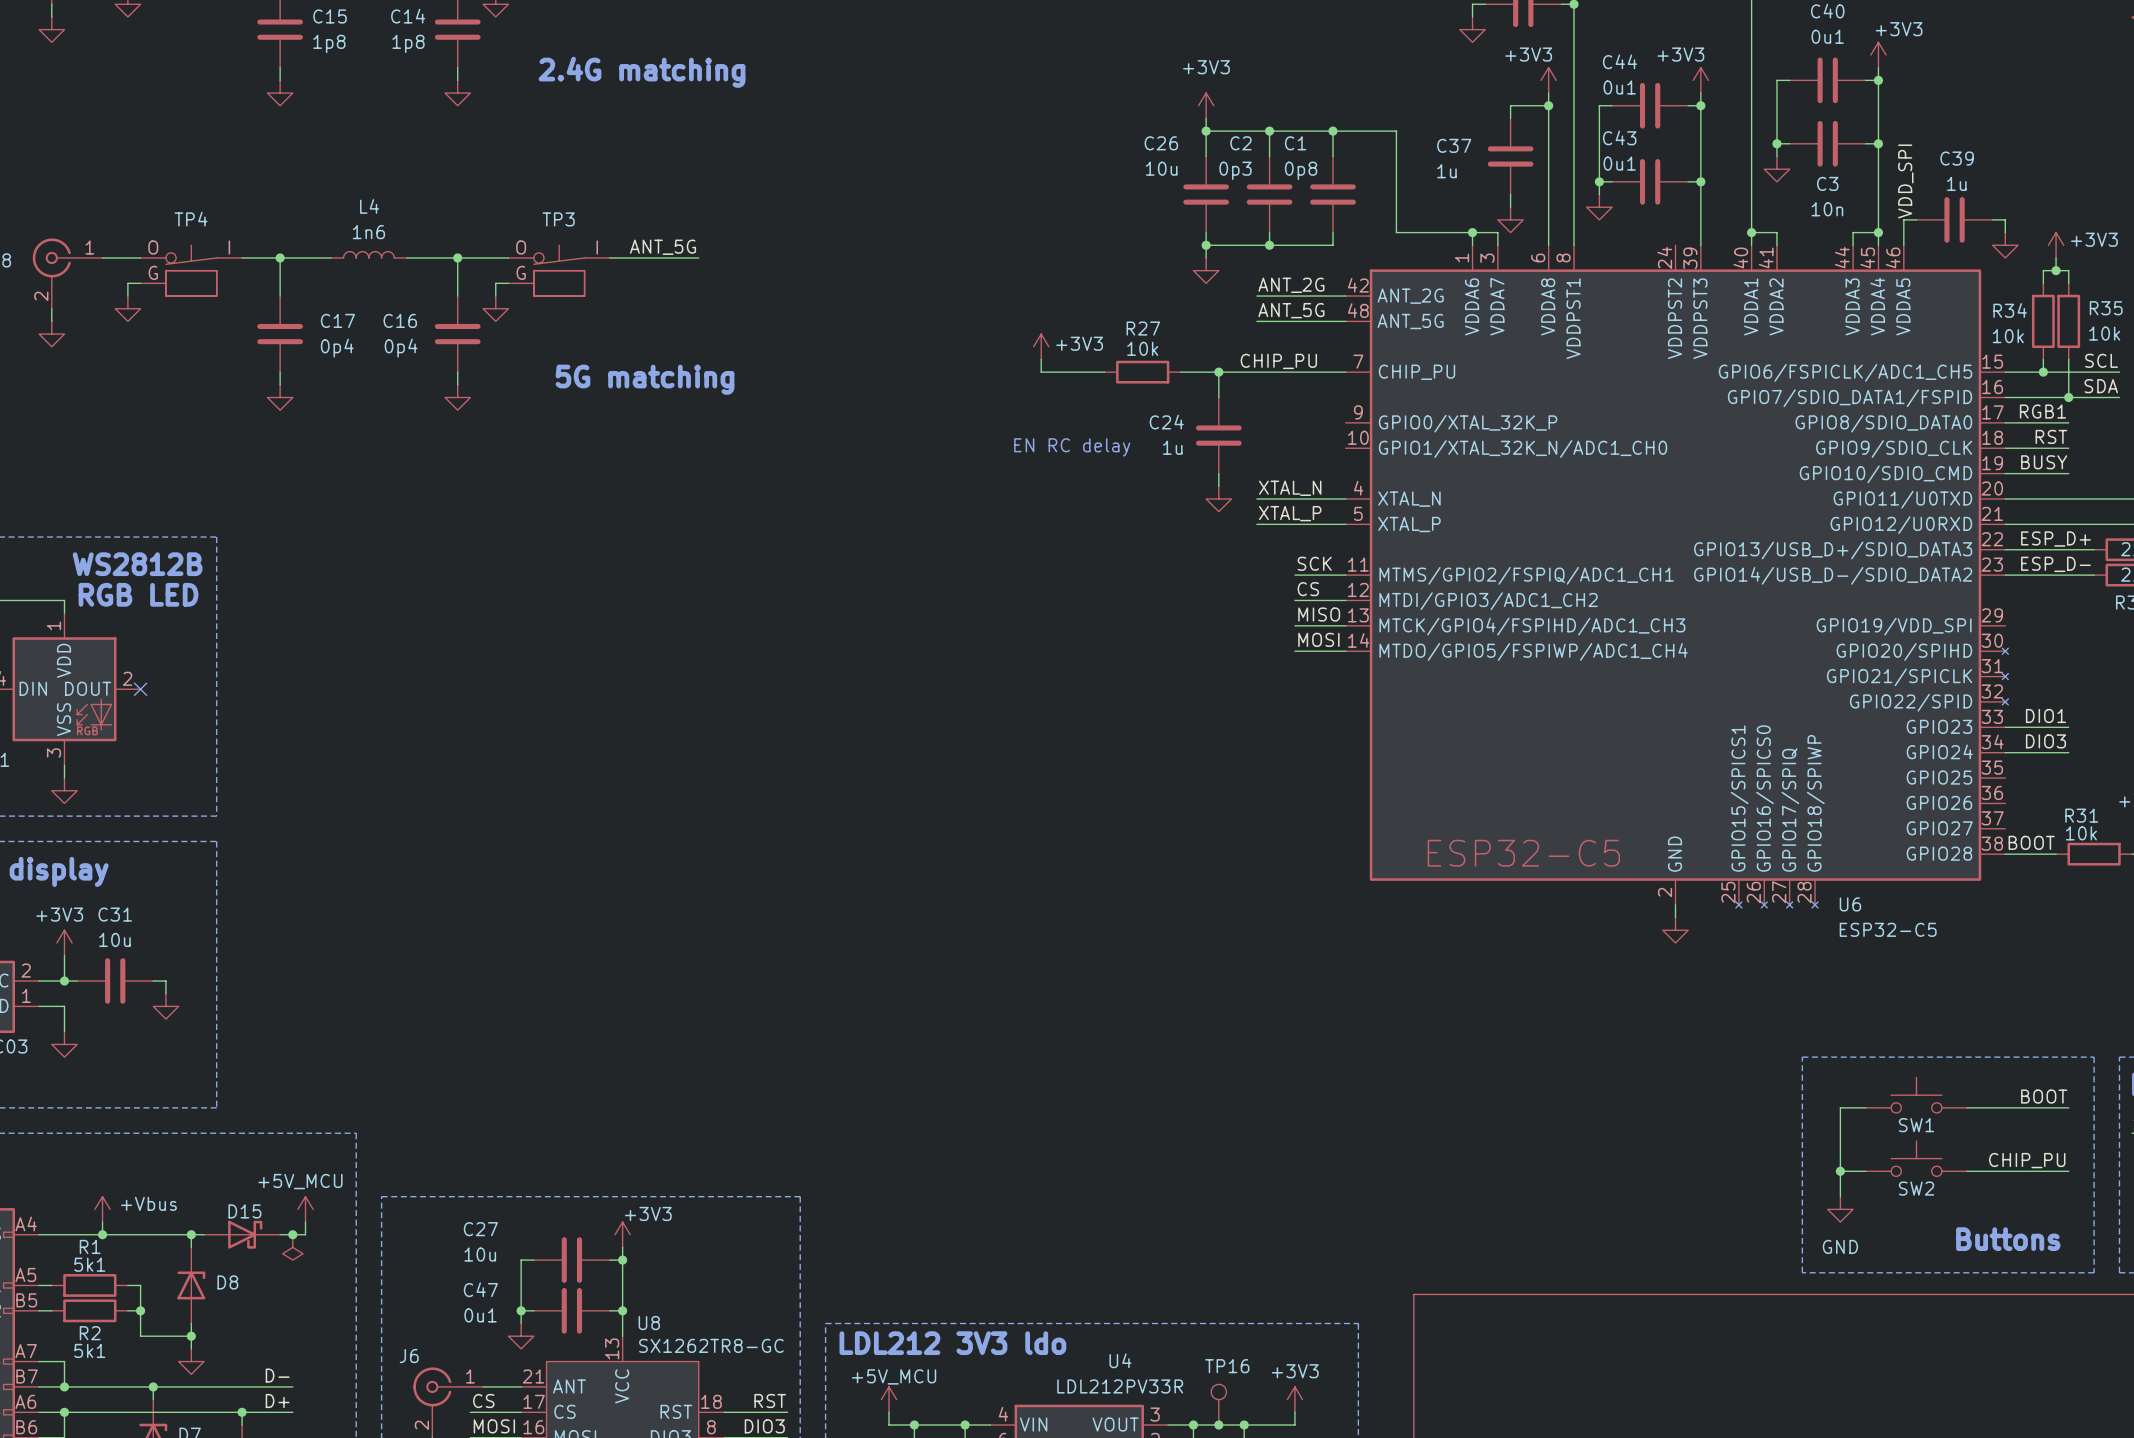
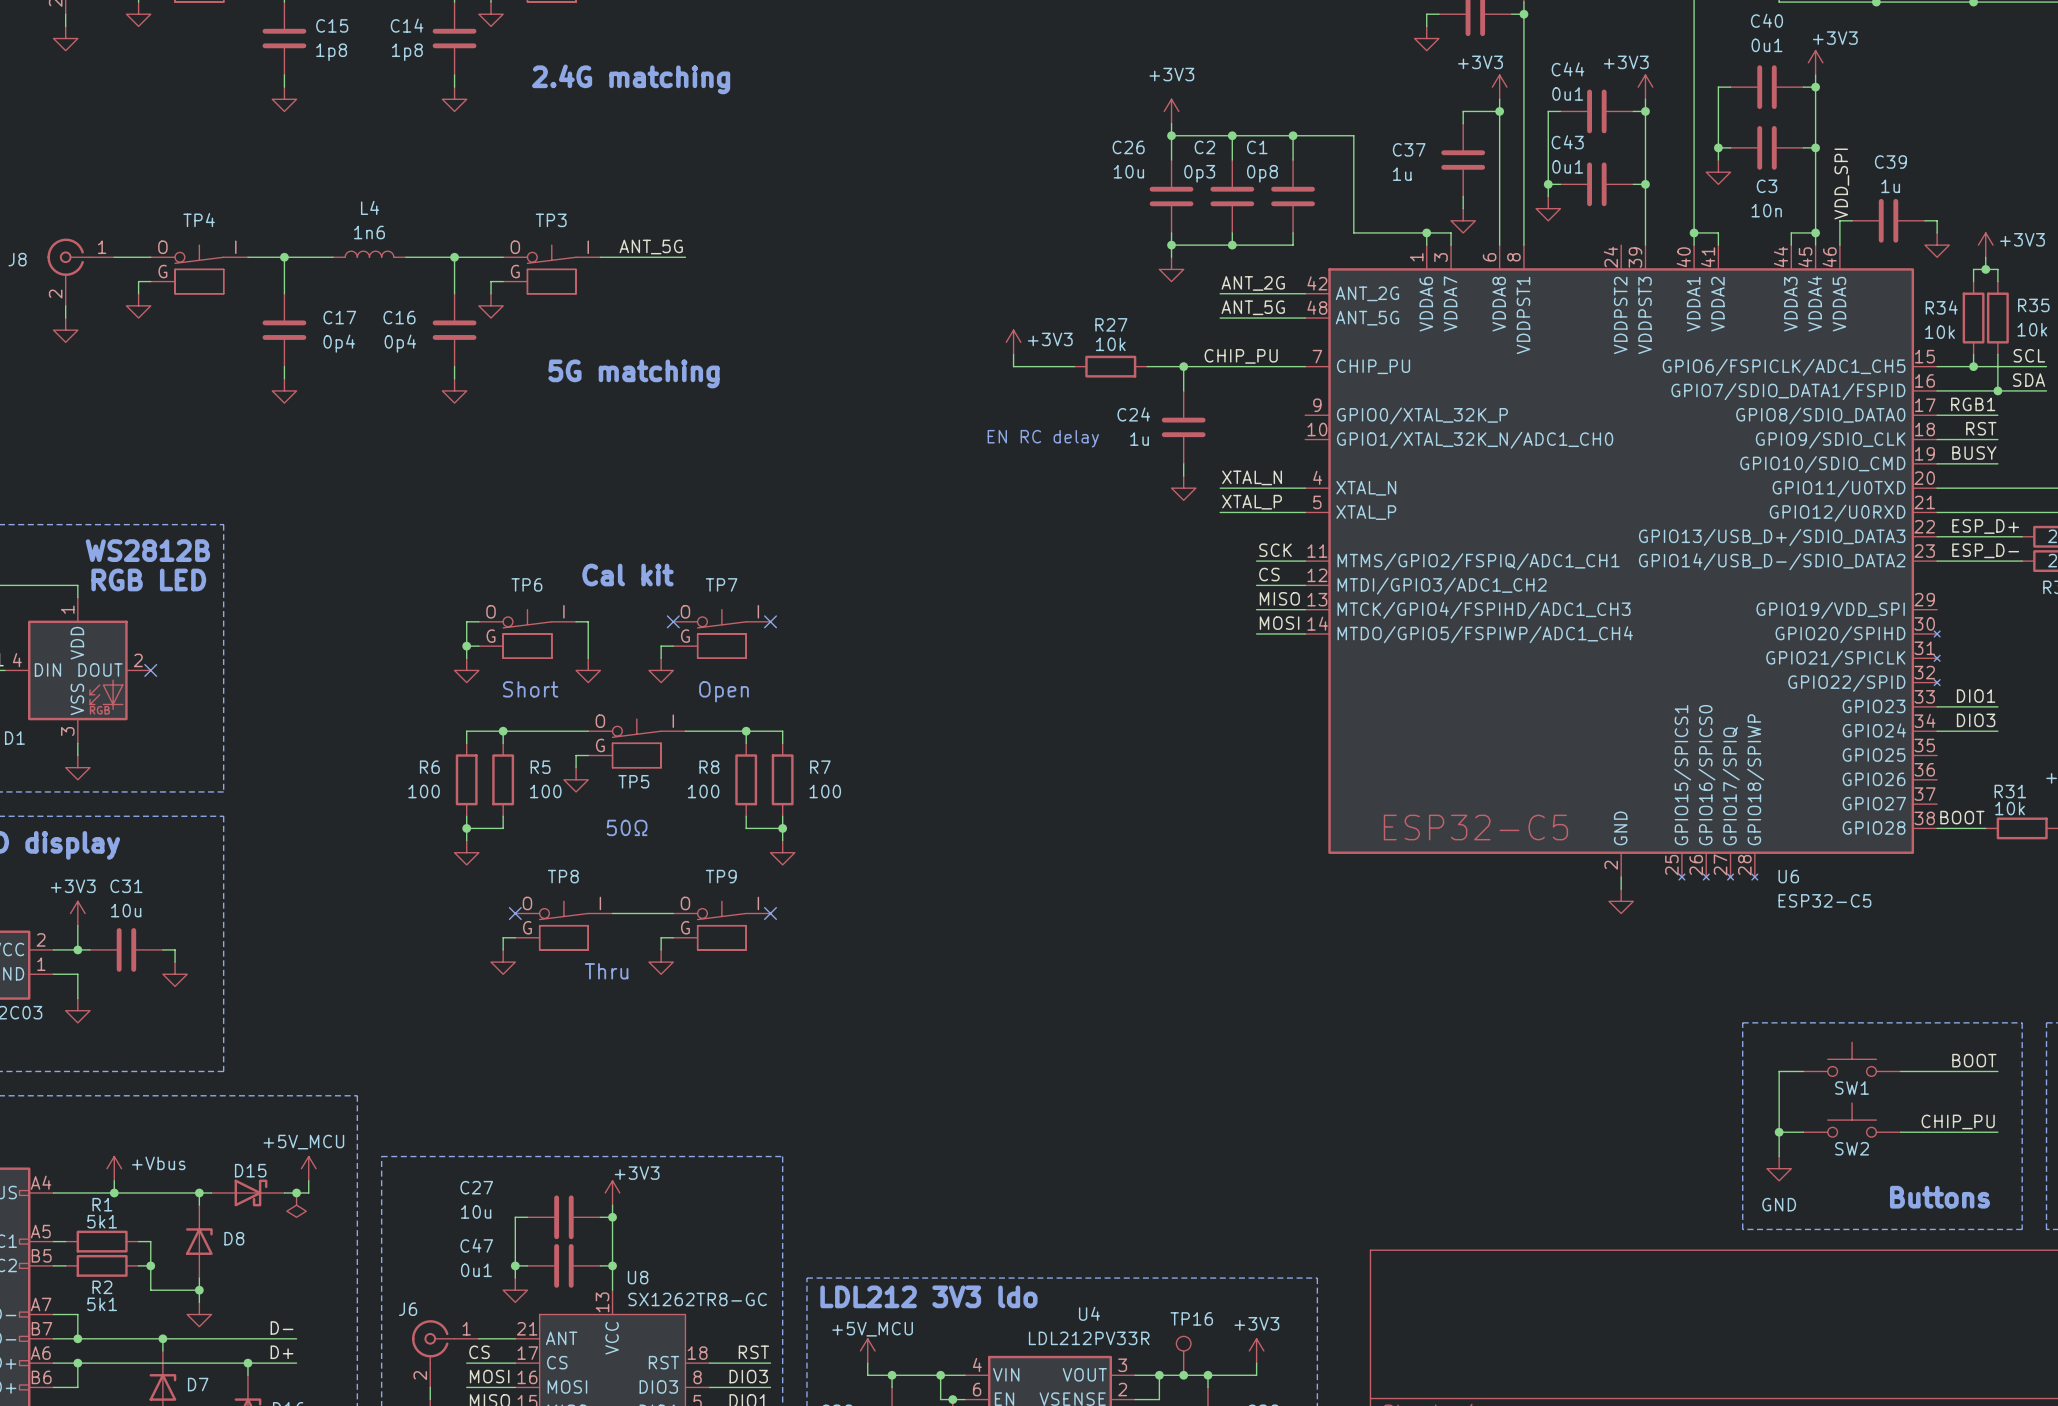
text: none -> Cal kit (627, 575)
wire: none -> (478, 621) (466, 621) (466, 658)
wire: none -> (576, 621) (588, 621) (588, 658)
no-connect mark: none -> (673, 621)
no-connect mark: none -> (770, 621)
TP6: none -> (527, 633)
TP7: none -> (721, 633)
wire: none -> (466, 646) (478, 646)
junction: none -> (466, 646)
wire: none -> (673, 646) (661, 646) (661, 658)
power symbol: none -> (466, 670)
power symbol: none -> (588, 670)
power symbol: none -> (661, 670)
text: none -> Short (530, 689)
text: none -> Open (723, 691)
wire: none -> (503, 731) (503, 743)
junction: none -> (503, 731)
wire: none -> (588, 731) (466, 731) (466, 743)
wire: none -> (685, 731) (782, 731) (782, 743)
wire: none -> (746, 731) (746, 743)
junction: none -> (746, 731)
TP5: none -> (636, 743)
wire: none -> (588, 755) (576, 755) (576, 767)
R6: none -> 100 (466, 779)
R5: none -> 100 (503, 779)
power symbol: none -> (576, 779)
R8: none -> 100 (746, 779)
R7: none -> 100 (782, 779)
wire: none -> (466, 816) (466, 840)
wire: none -> (503, 816) (503, 828) (466, 828)
wire: none -> (746, 816) (746, 828) (782, 828)
wire: none -> (782, 816) (782, 840)
text: none -> 50Ω (627, 827)
junction: none -> (466, 828)
junction: none -> (782, 828)
power symbol: none -> (466, 852)
power symbol: none -> (782, 852)
no-connect mark: none -> (515, 913)
wire: none -> (612, 913) (673, 913)
no-connect mark: none -> (770, 913)
TP8: none -> (563, 925)
TP9: none -> (721, 925)
wire: none -> (515, 937) (503, 937) (503, 949)
wire: none -> (673, 937) (661, 937) (661, 949)
power symbol: none -> (503, 962)
power symbol: none -> (661, 962)
text: none -> Thru (606, 971)

